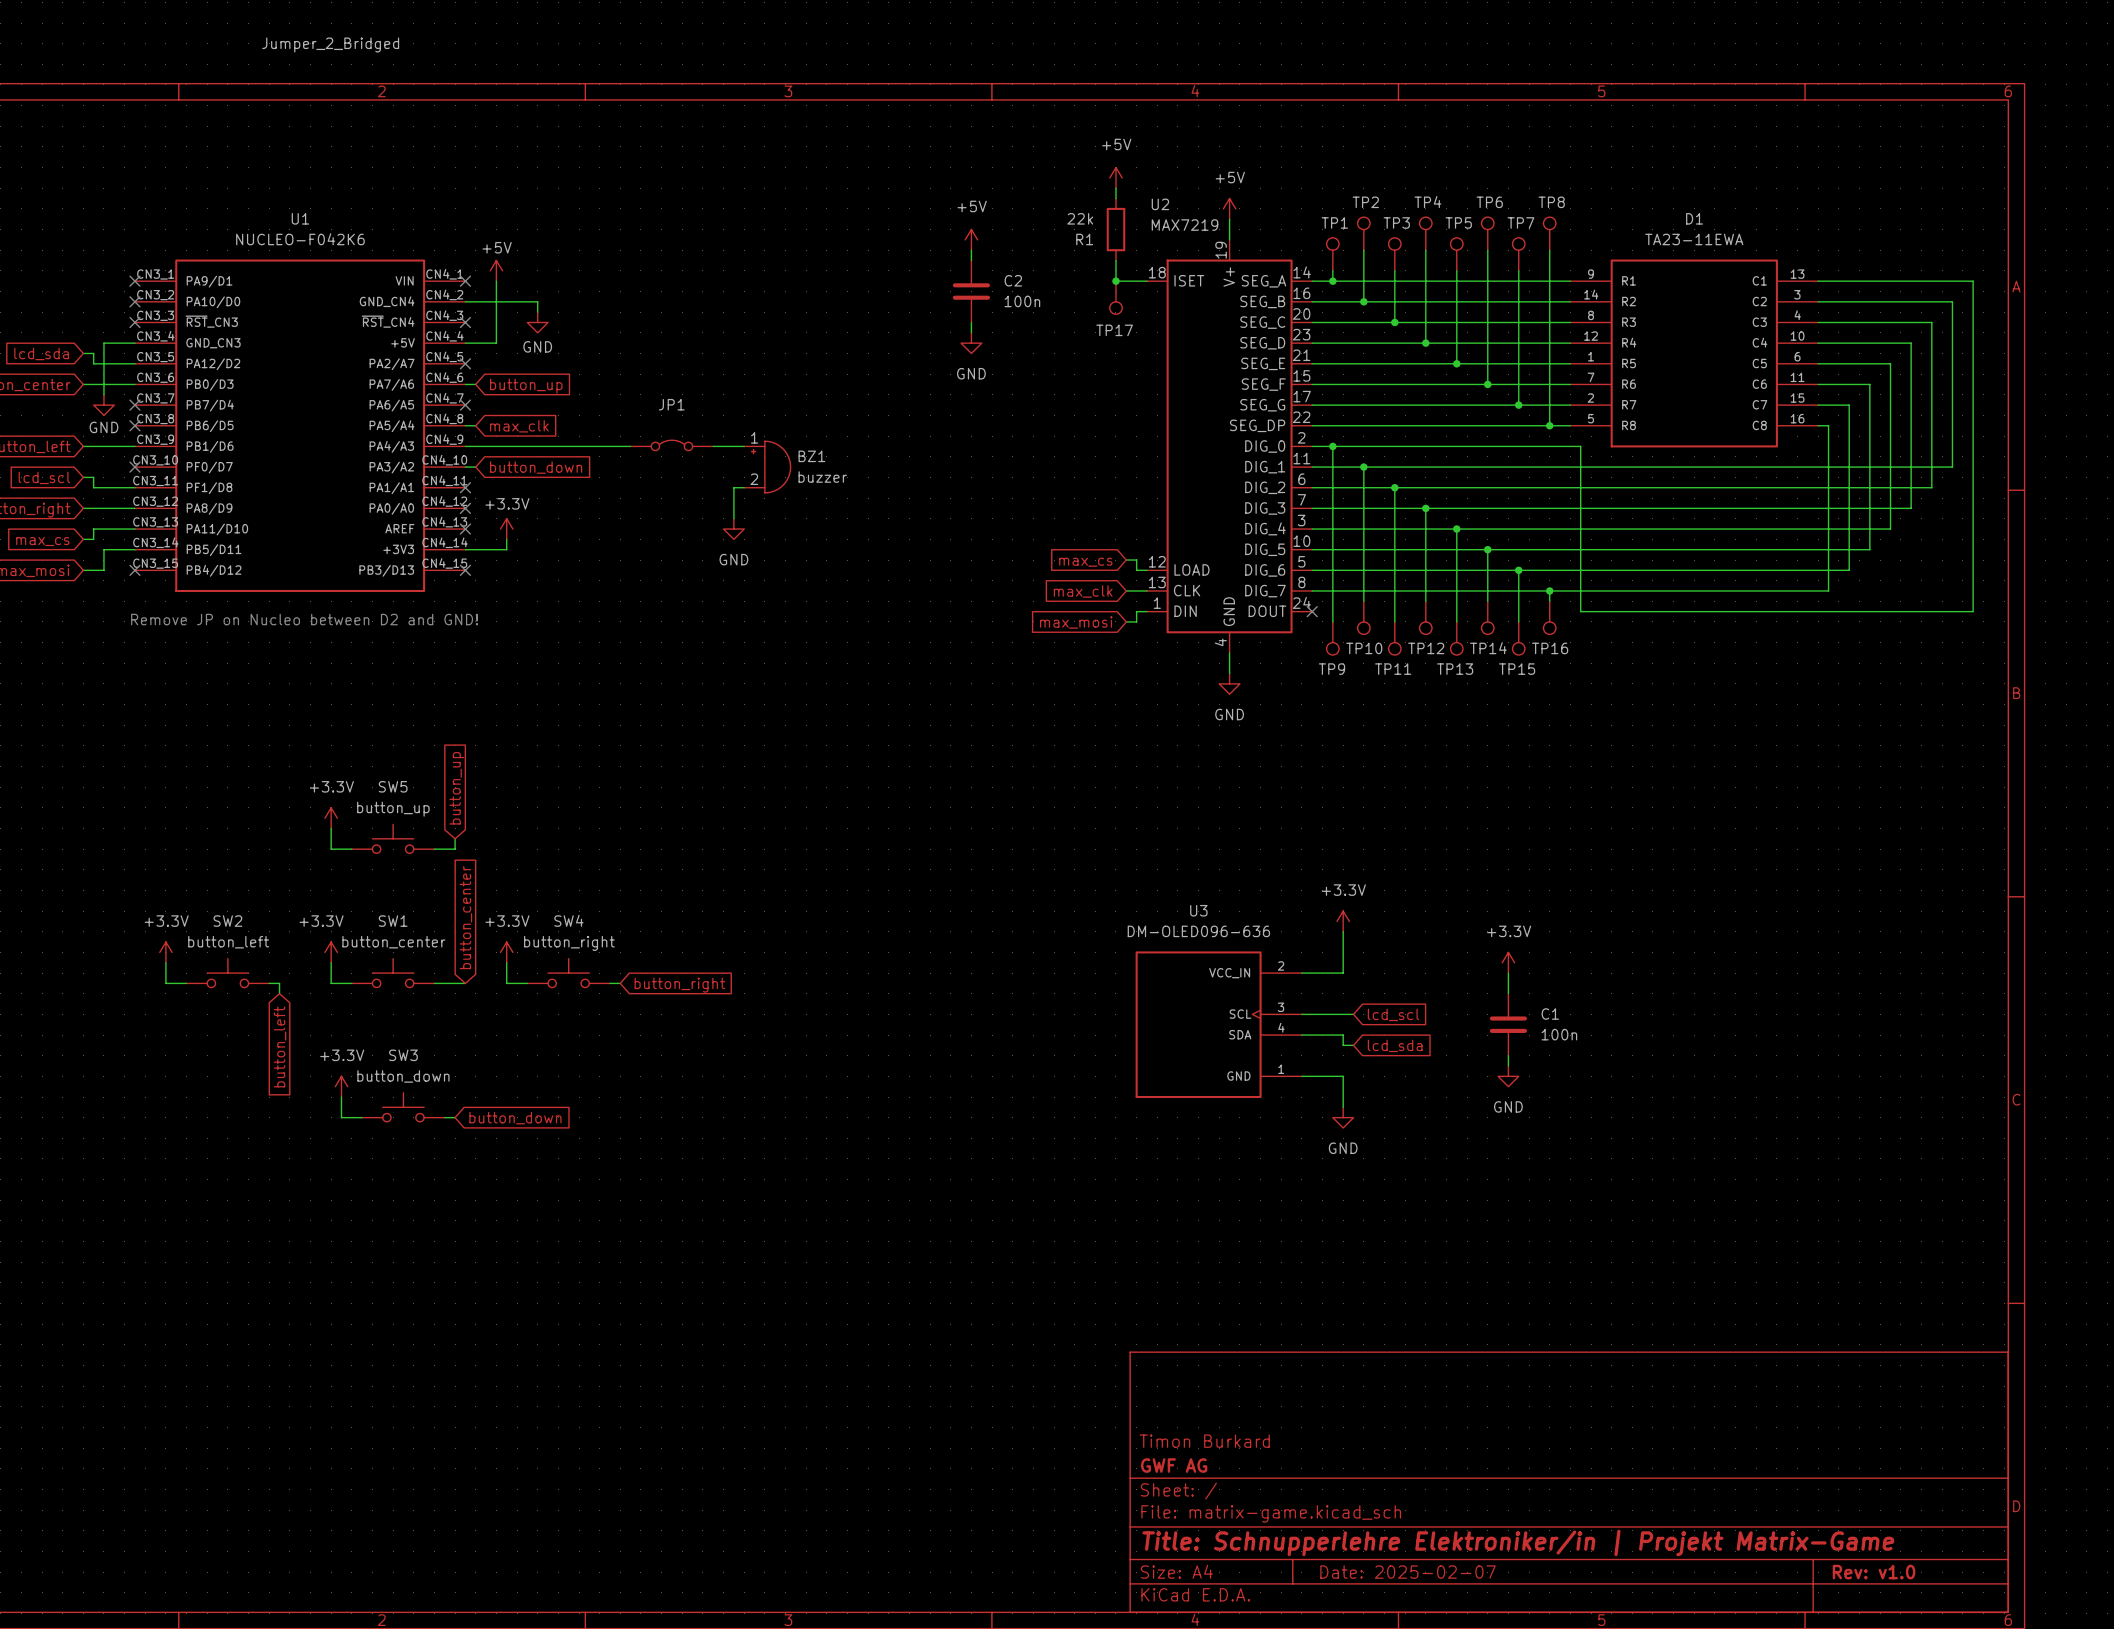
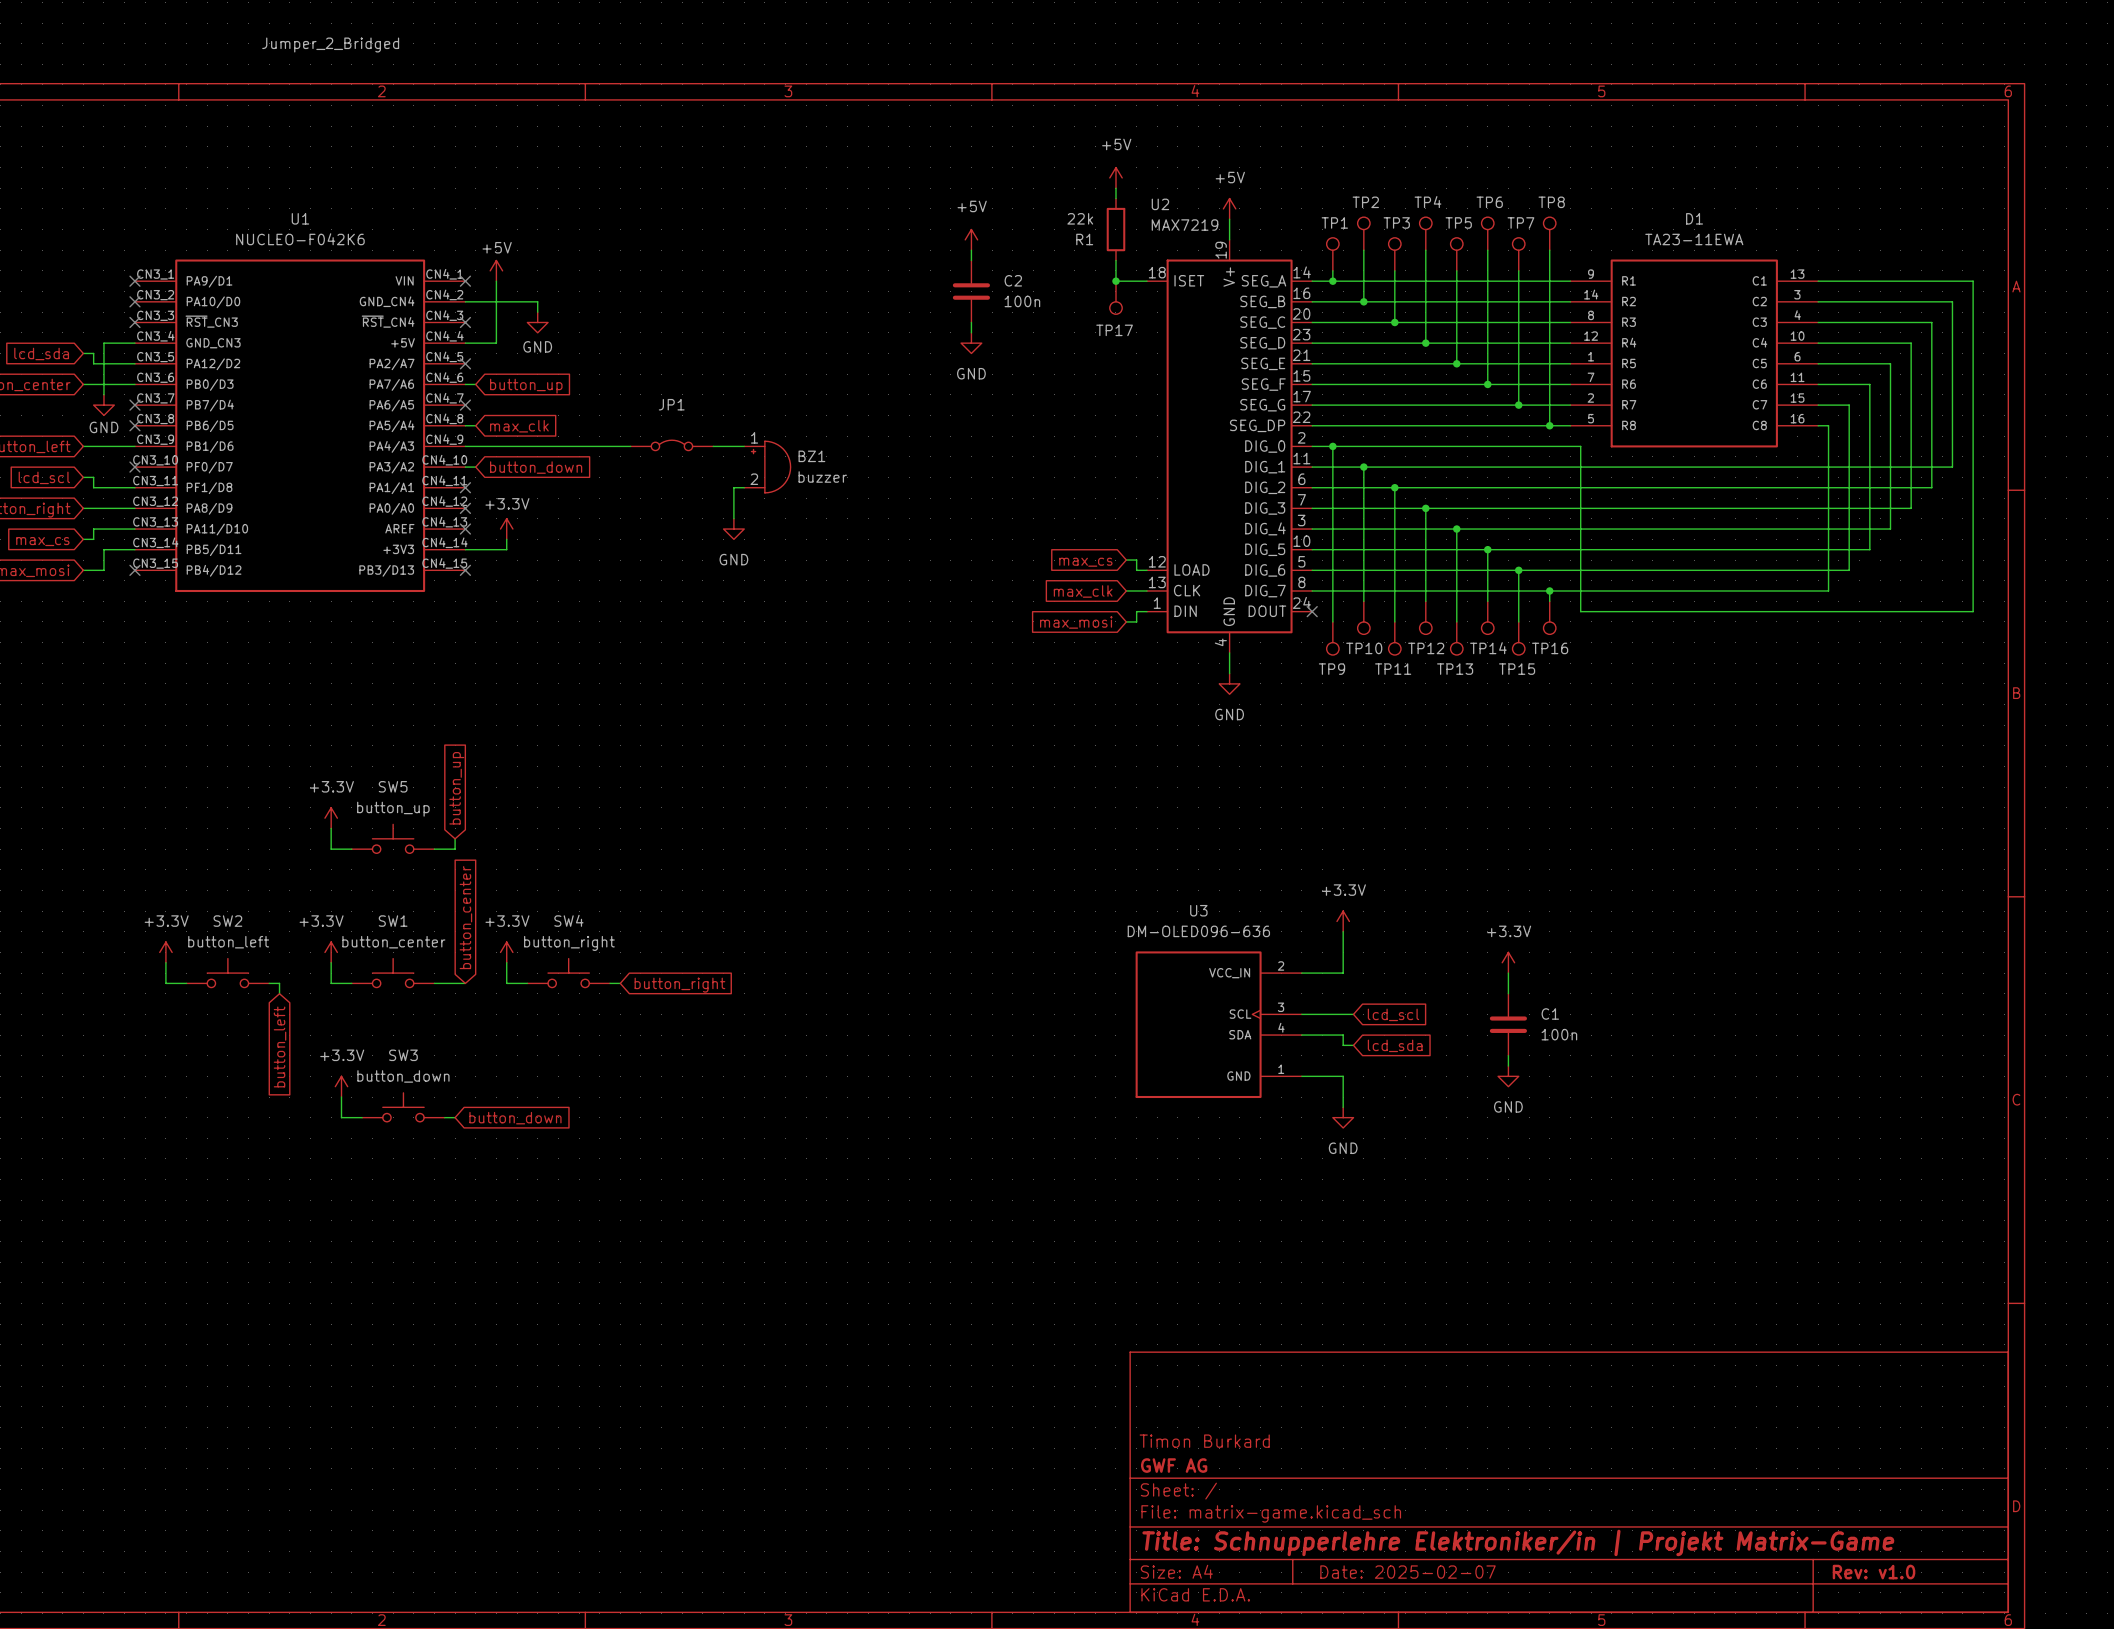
text: Remove JP on Nucleo between D2 and GND! (304, 619) -> none

